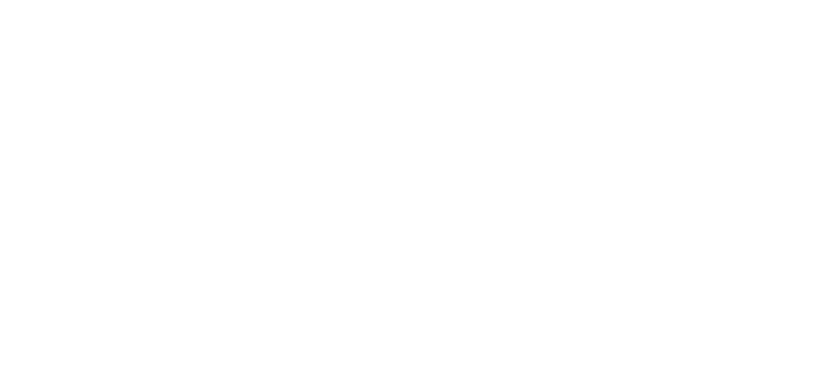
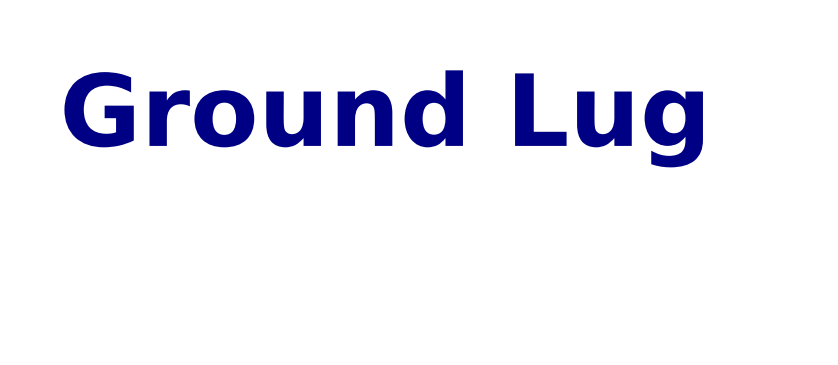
text: none -> Ground Lug (383, 118)

